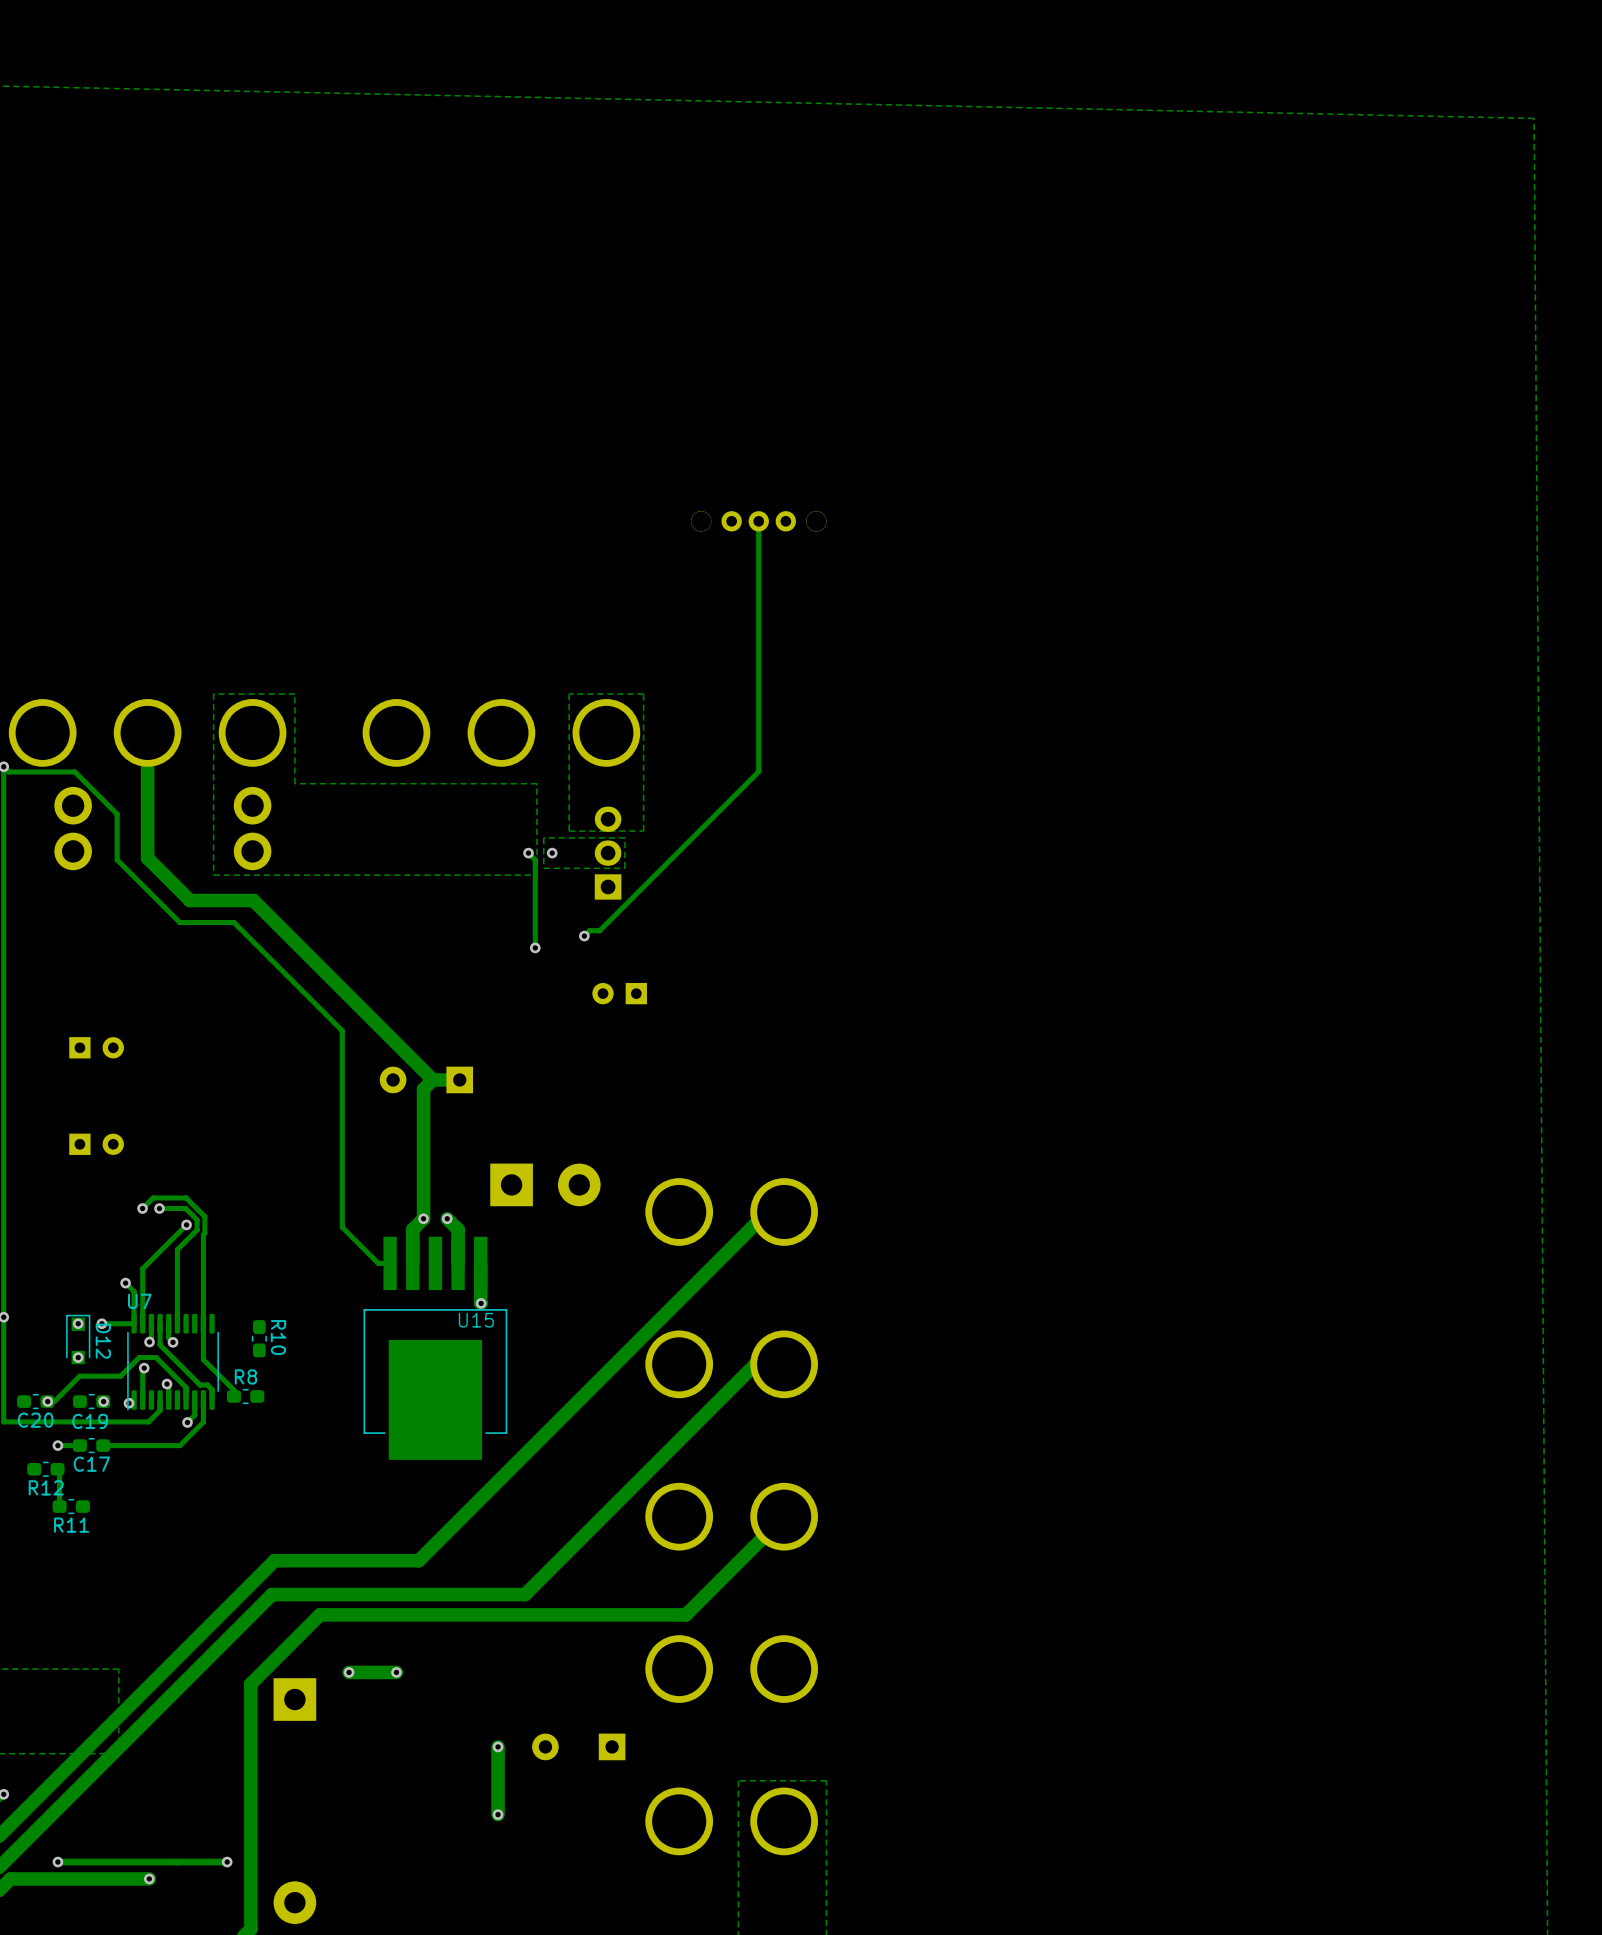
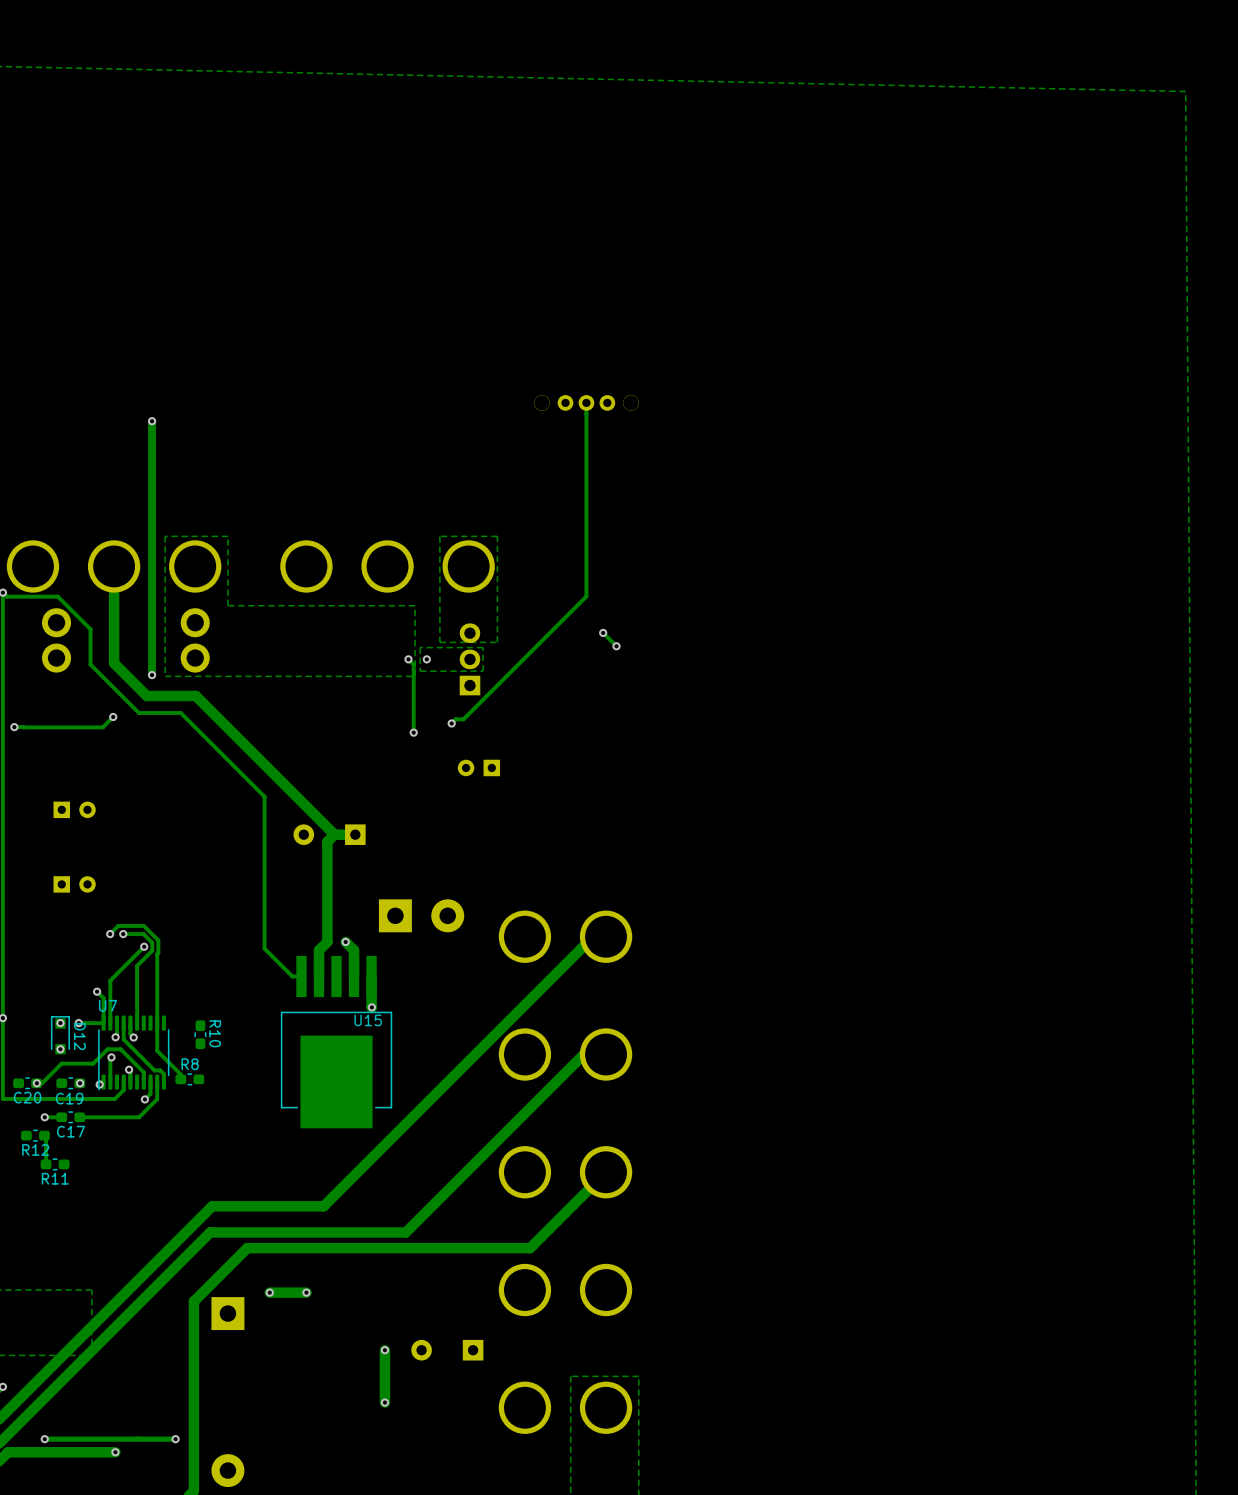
track: none -> (152, 421) (152, 675)
via: none -> (152, 421)
track: none -> (603, 632) (616, 646)
via: none -> (603, 632)
via: none -> (616, 646)
via: none -> (152, 675)
track: none -> (113, 716) (102, 727) (14, 727)
via: none -> (113, 716)
via: none -> (14, 727)
via: (423, 1218) -> none

